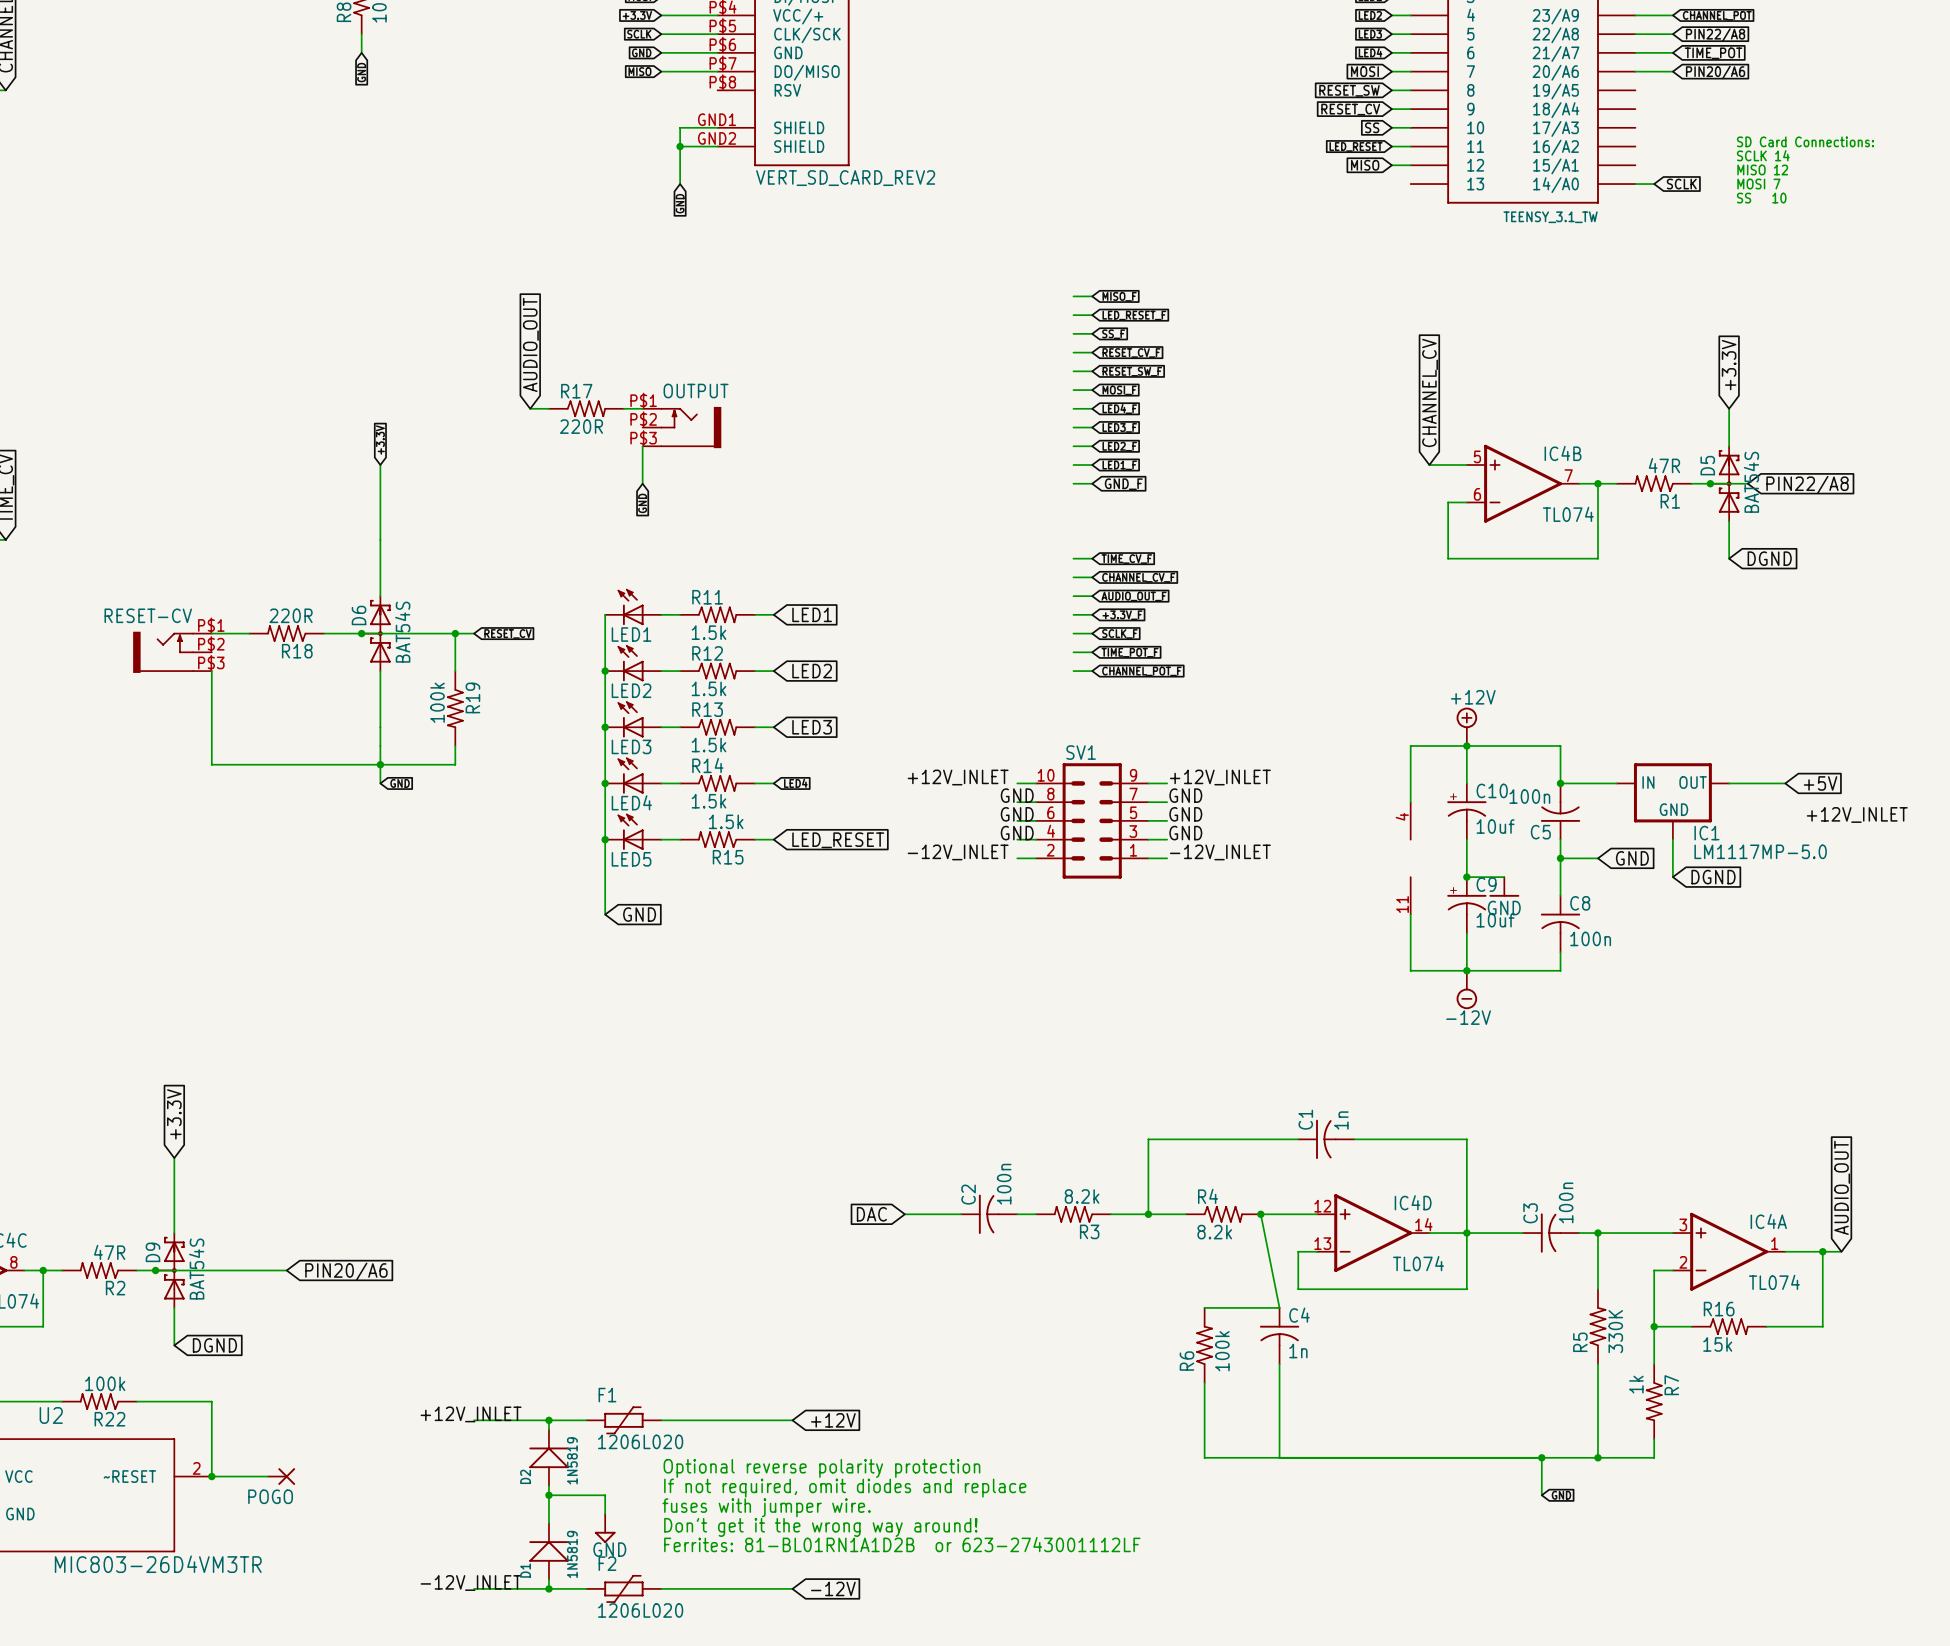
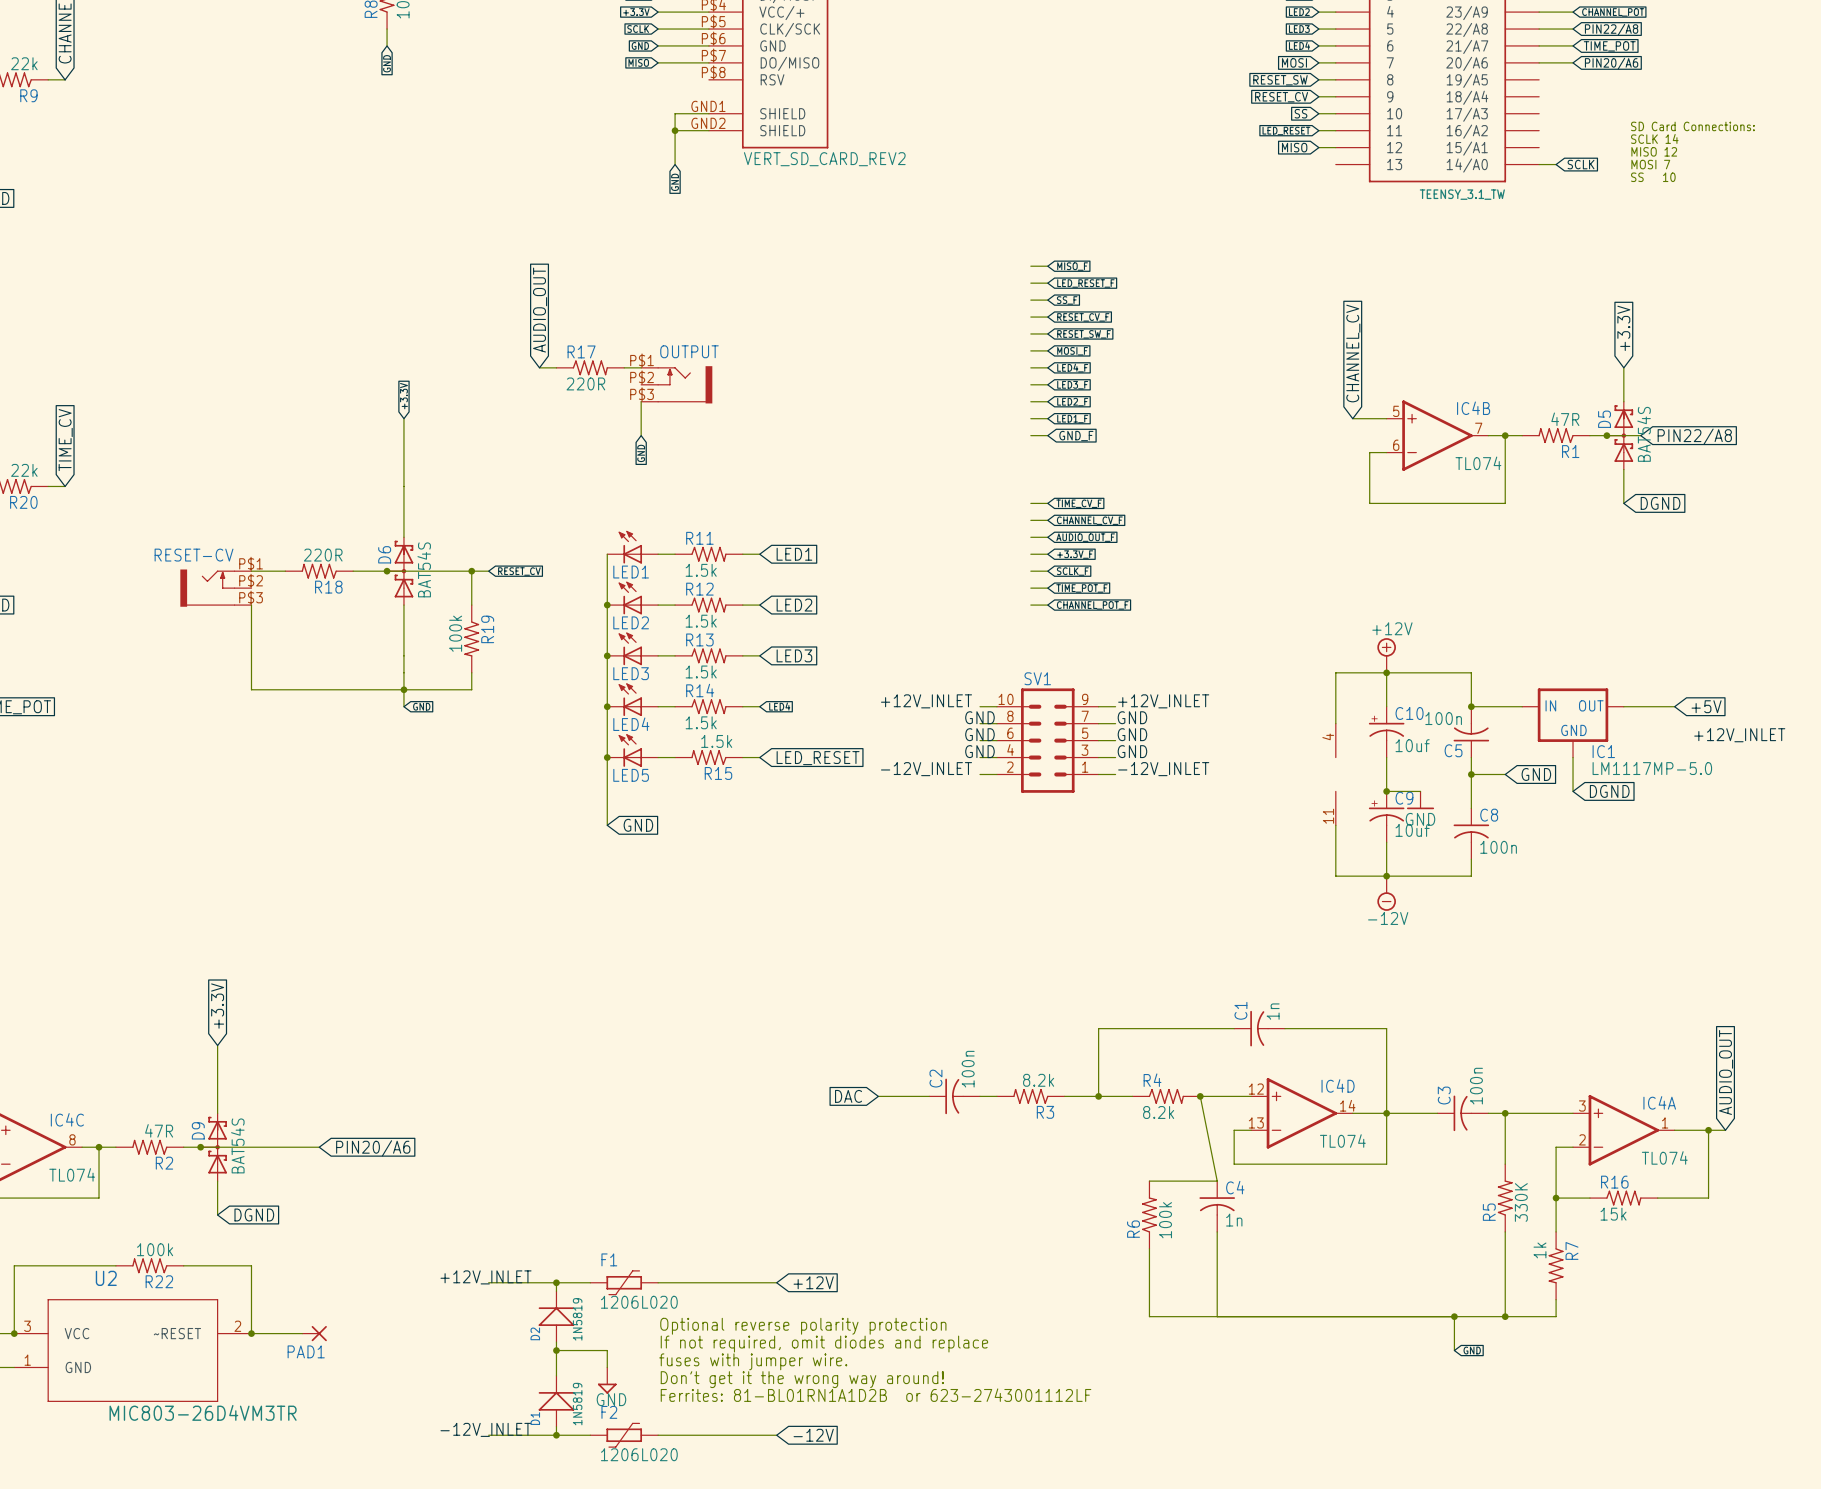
POGO name: POGO (270, 1496) -> PAD1 (306, 1351)

